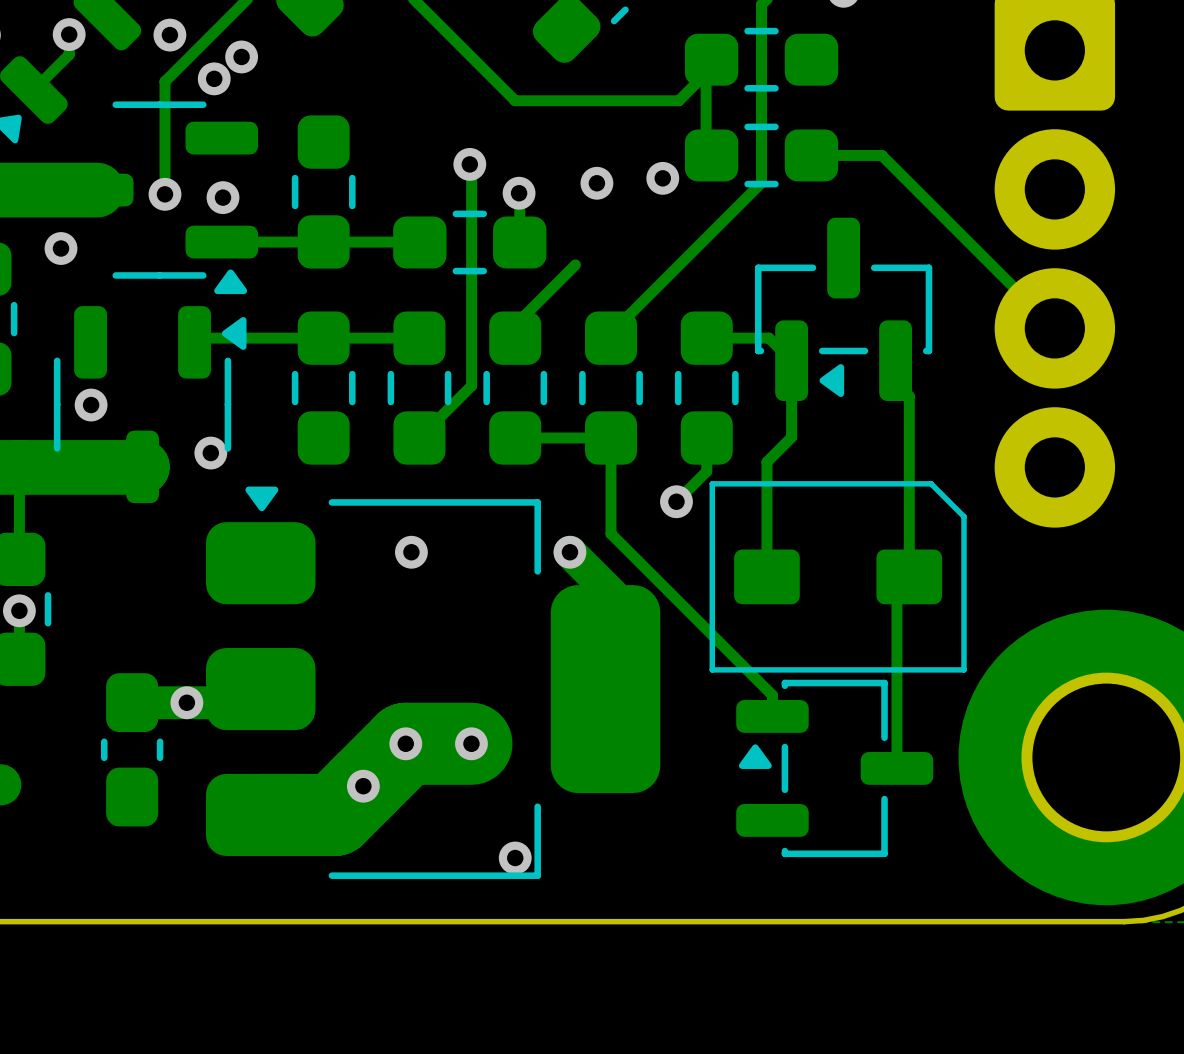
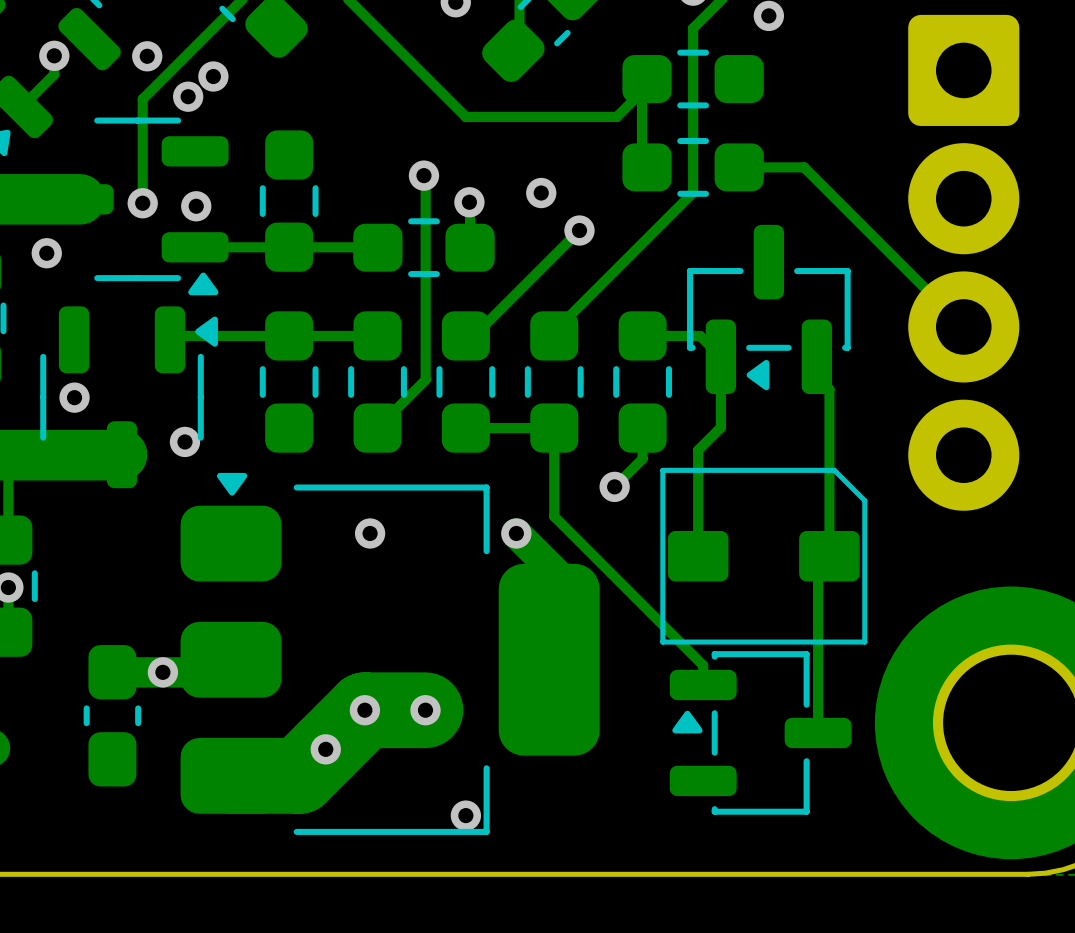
via position: (662, 178) -> (579, 230)
track: none -> (579, 230) (474, 335)
track: (575, 264) (515, 325) (515, 338) -> none
part footprint: [709, 481, 967, 673] -> [660, 467, 868, 645]

